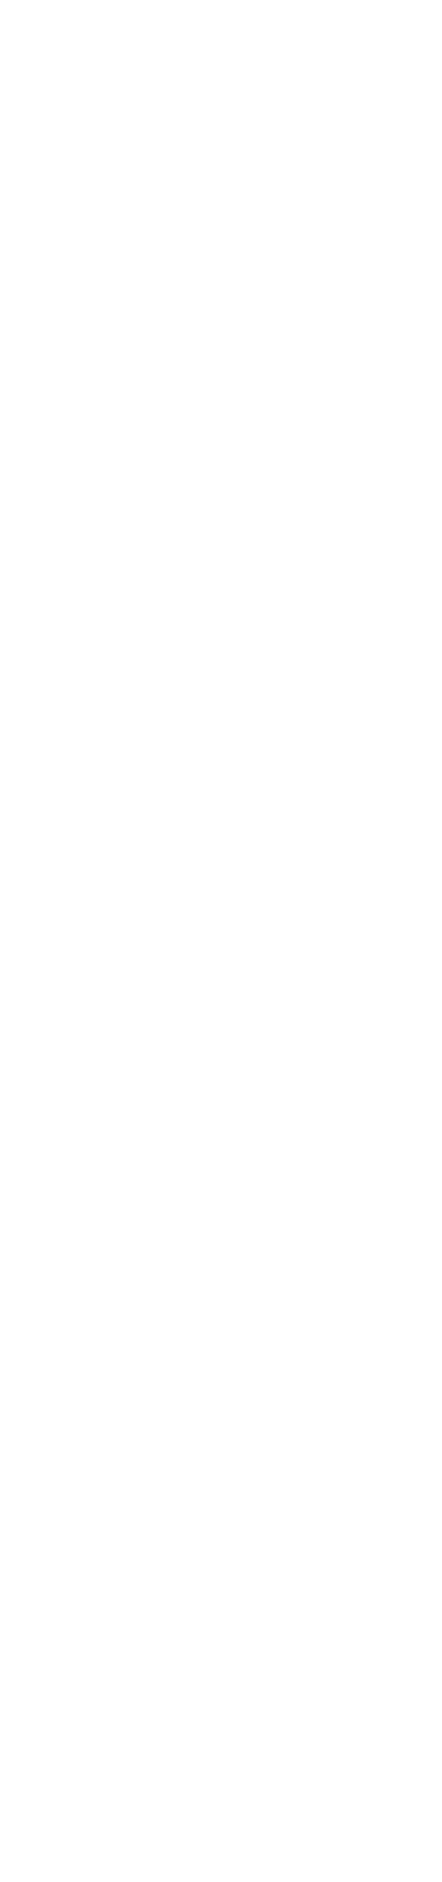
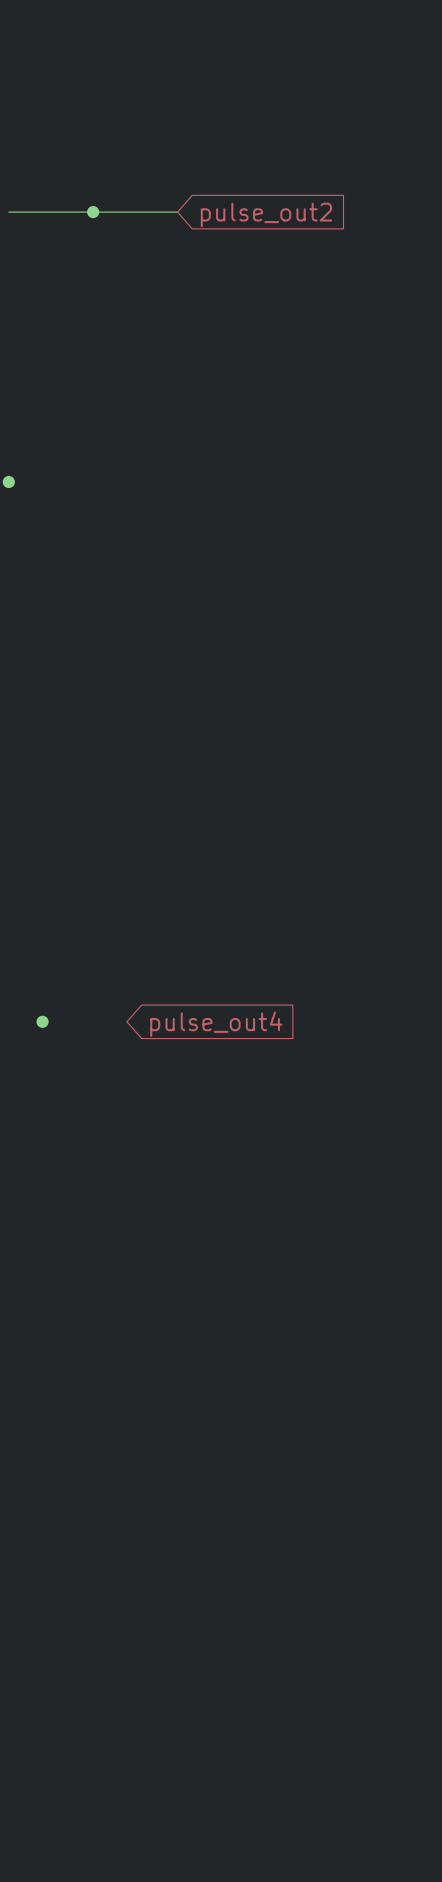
wire: none -> (8, 212) (177, 212)
junction: none -> (93, 212)
global label: none -> pulse_out2 (266, 214)
junction: none -> (8, 481)
junction: none -> (42, 1021)
global label: none -> pulse_out4 (216, 1024)

